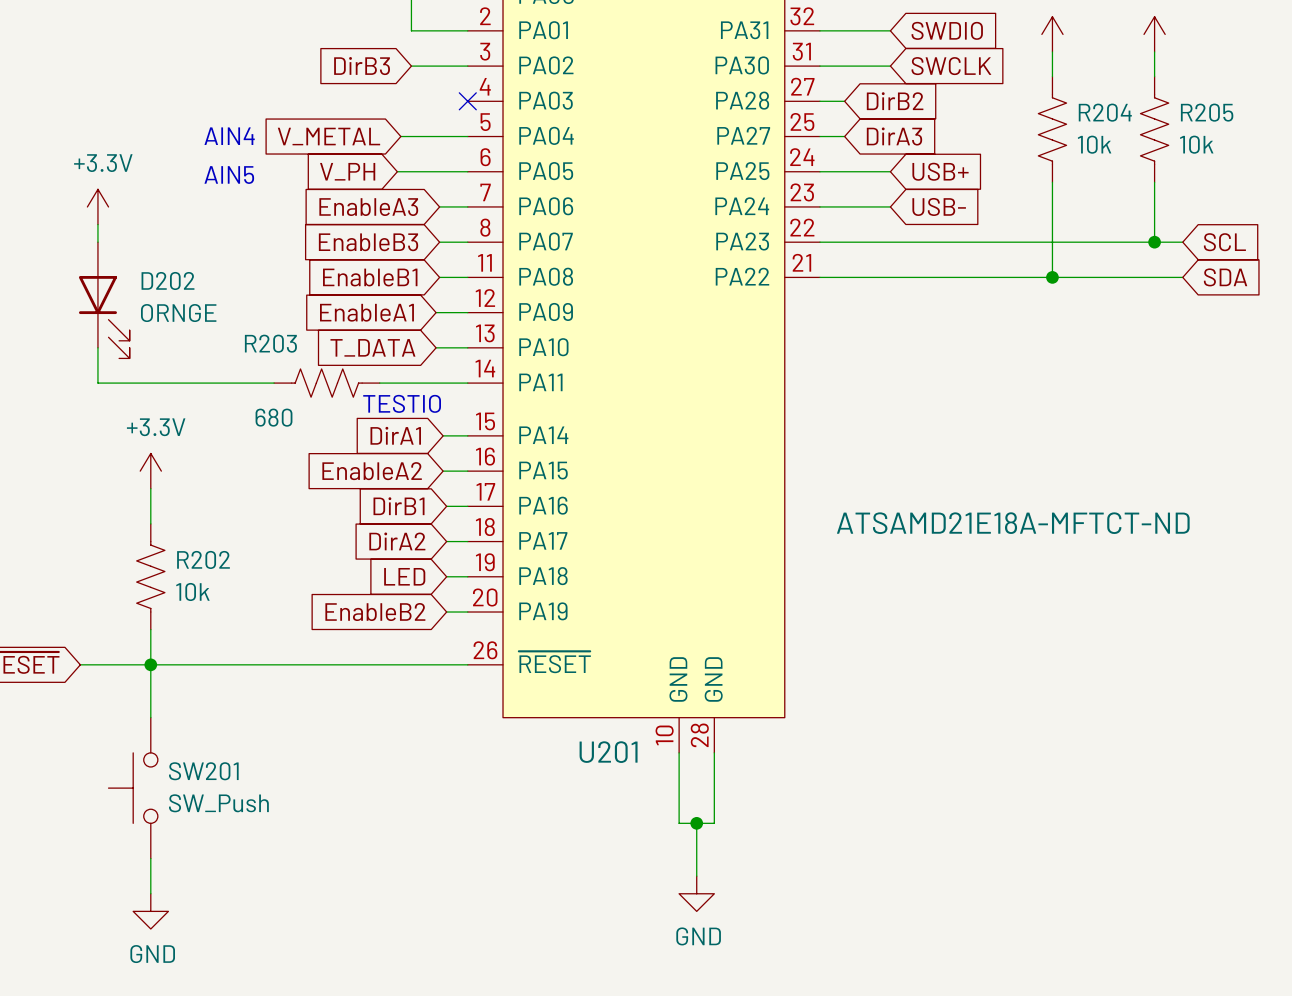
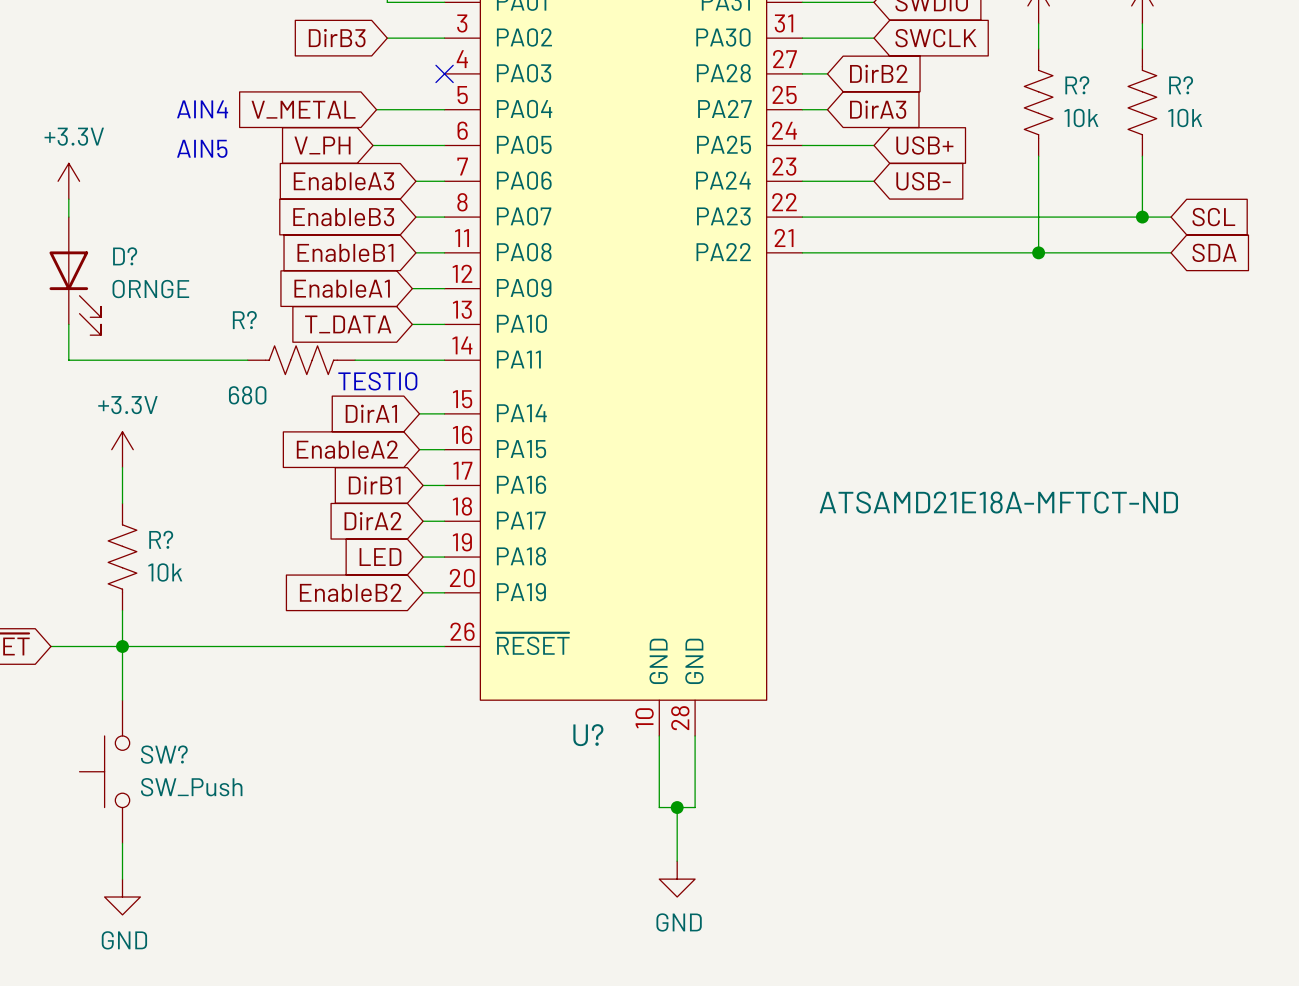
R204 name: R204 (1105, 112) -> R? (1077, 85)
R205 name: R205 (1207, 112) -> R? (1181, 85)
D202 name: D202 (167, 280) -> D? (125, 256)
R203 name: R203 (270, 343) -> R? (244, 320)
R202 name: R202 (203, 559) -> R? (161, 539)
U201 name: U201 (608, 752) -> U? (588, 735)
SW201 name: SW201 (203, 771) -> SW? (164, 754)

